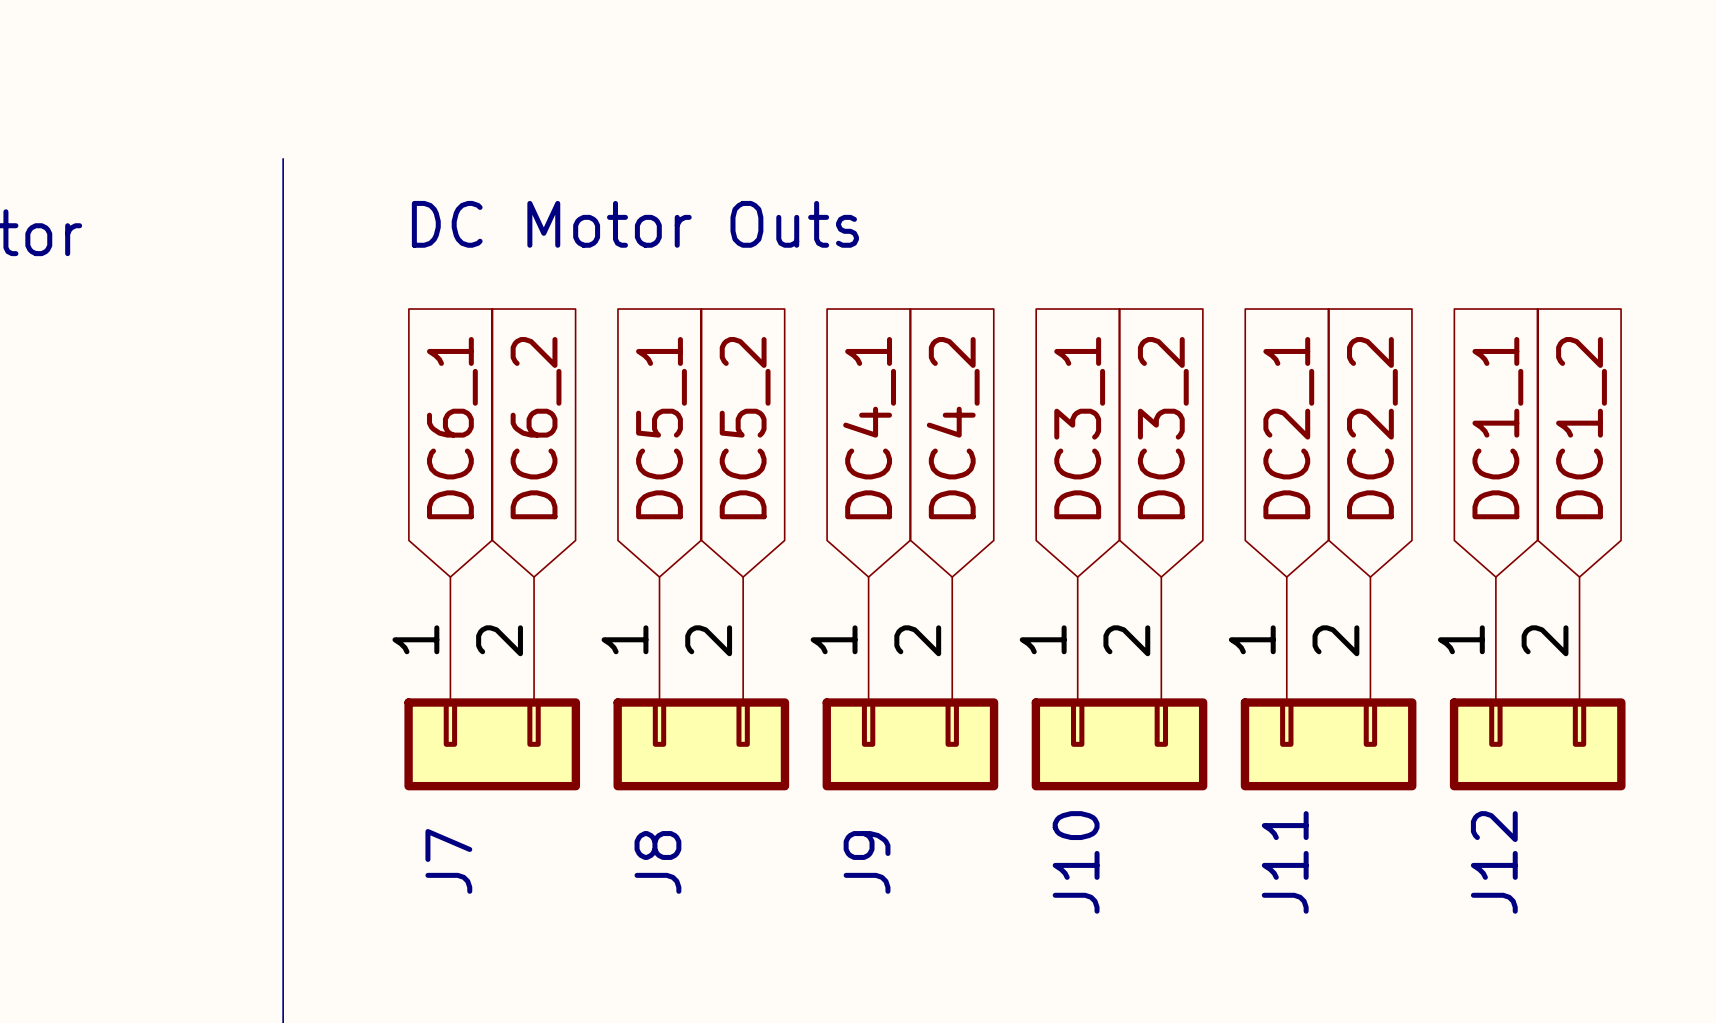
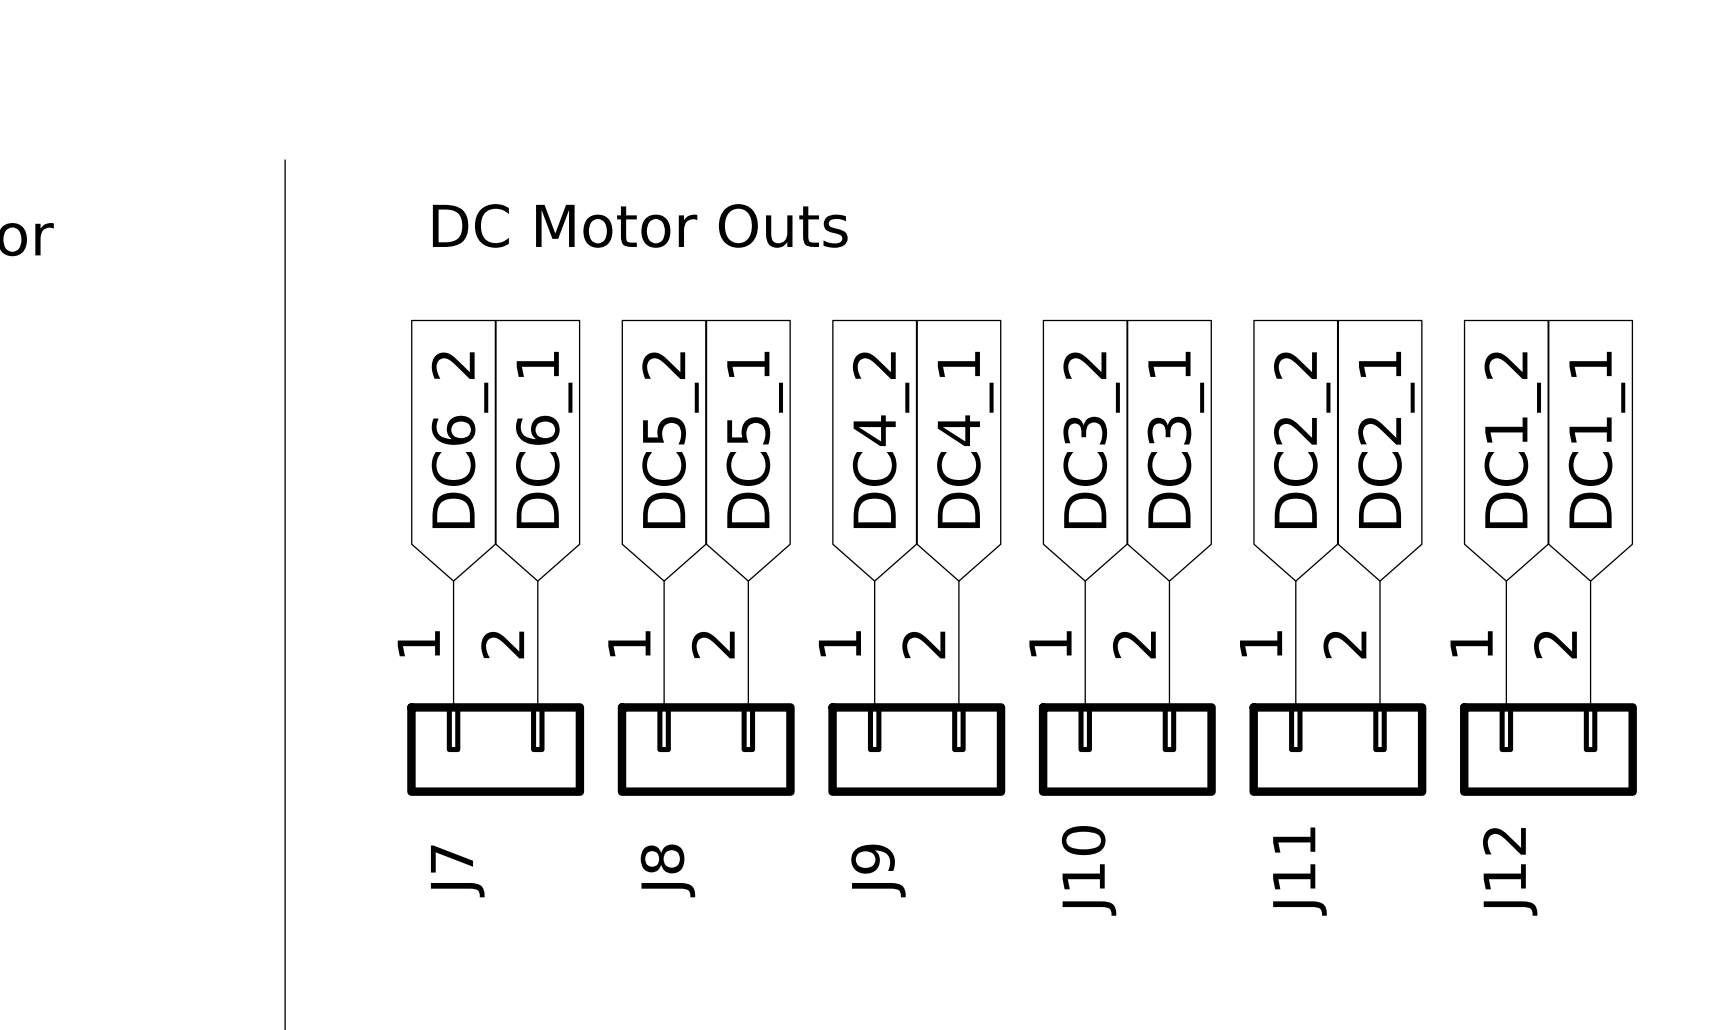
global label: DC6_1 (452, 428) -> DC6_2 (459, 440)
global label: DC6_2 (536, 428) -> DC6_1 (544, 439)
global label: DC5_1 (661, 428) -> DC5_2 (670, 440)
global label: DC5_2 (745, 428) -> DC5_1 (754, 439)
global label: DC4_1 (869, 428) -> DC4_2 (881, 440)
global label: DC4_2 (953, 428) -> DC4_1 (965, 439)
global label: DC3_1 (1079, 428) -> DC3_2 (1091, 440)
global label: DC3_2 (1163, 428) -> DC3_1 (1175, 439)
global label: DC2_1 (1288, 428) -> DC2_2 (1302, 440)
global label: DC2_2 (1372, 428) -> DC2_1 (1386, 439)
global label: DC1_1 (1497, 428) -> DC1_2 (1512, 440)
global label: DC1_2 (1581, 428) -> DC1_1 (1597, 439)

